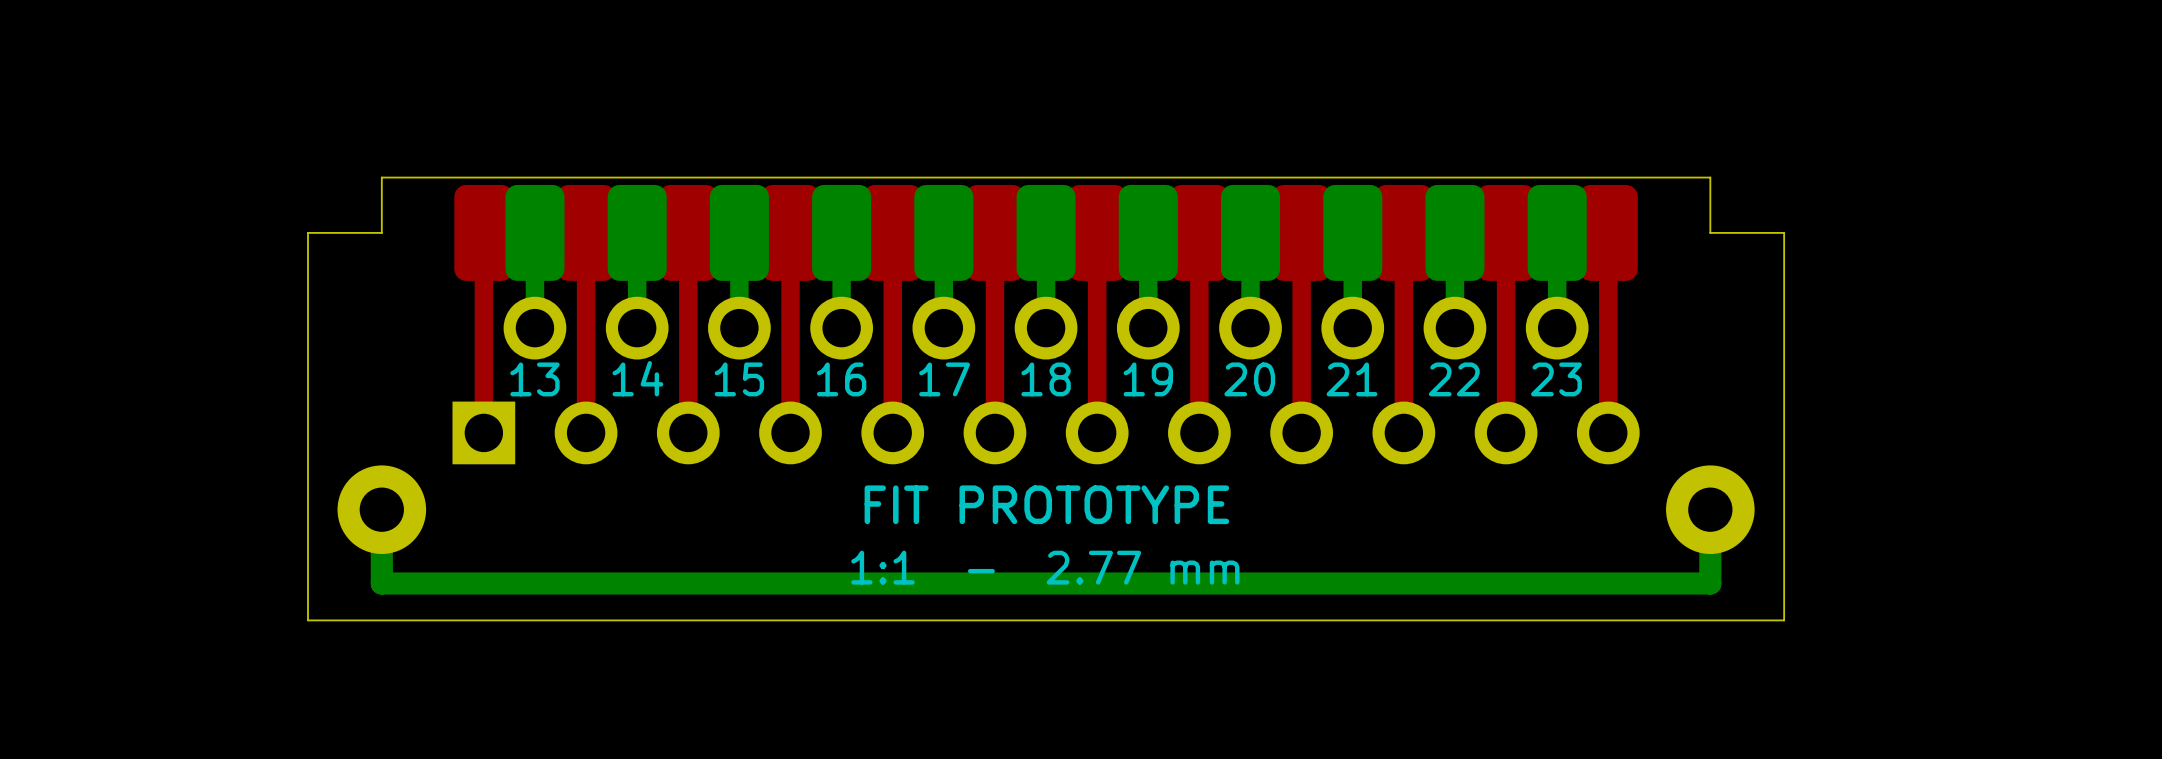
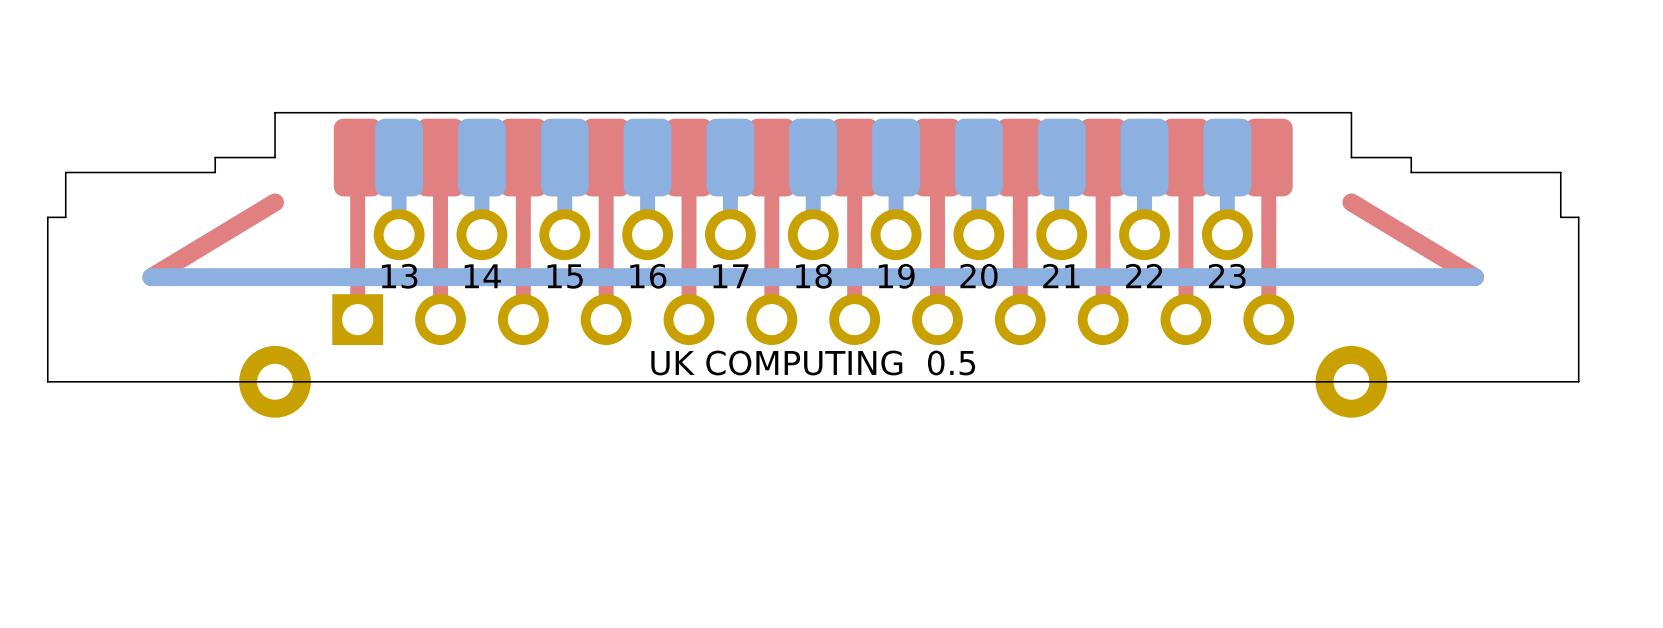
board edge: (1784, 251) (1784, 620) (308, 620) (308, 251) -> (1411, 172) (1560, 172) (1560, 217) (1578, 217) (1578, 381) (47, 381) (47, 217) (65, 217) (65, 172) (215, 172)
top track: none -> (275, 202) (151, 277)
top track: none -> (1351, 202) (1475, 277)
bottom track: none -> (1475, 277) (151, 277)
text: FIT PROTOTYPE (1046, 504) -> UK COMPUTING 0.5 (813, 362)
bottom track: (1710, 509) (1710, 583) (381, 583) (381, 509) -> none
text: 1:1 - 2.77 mm (1045, 567) -> none

